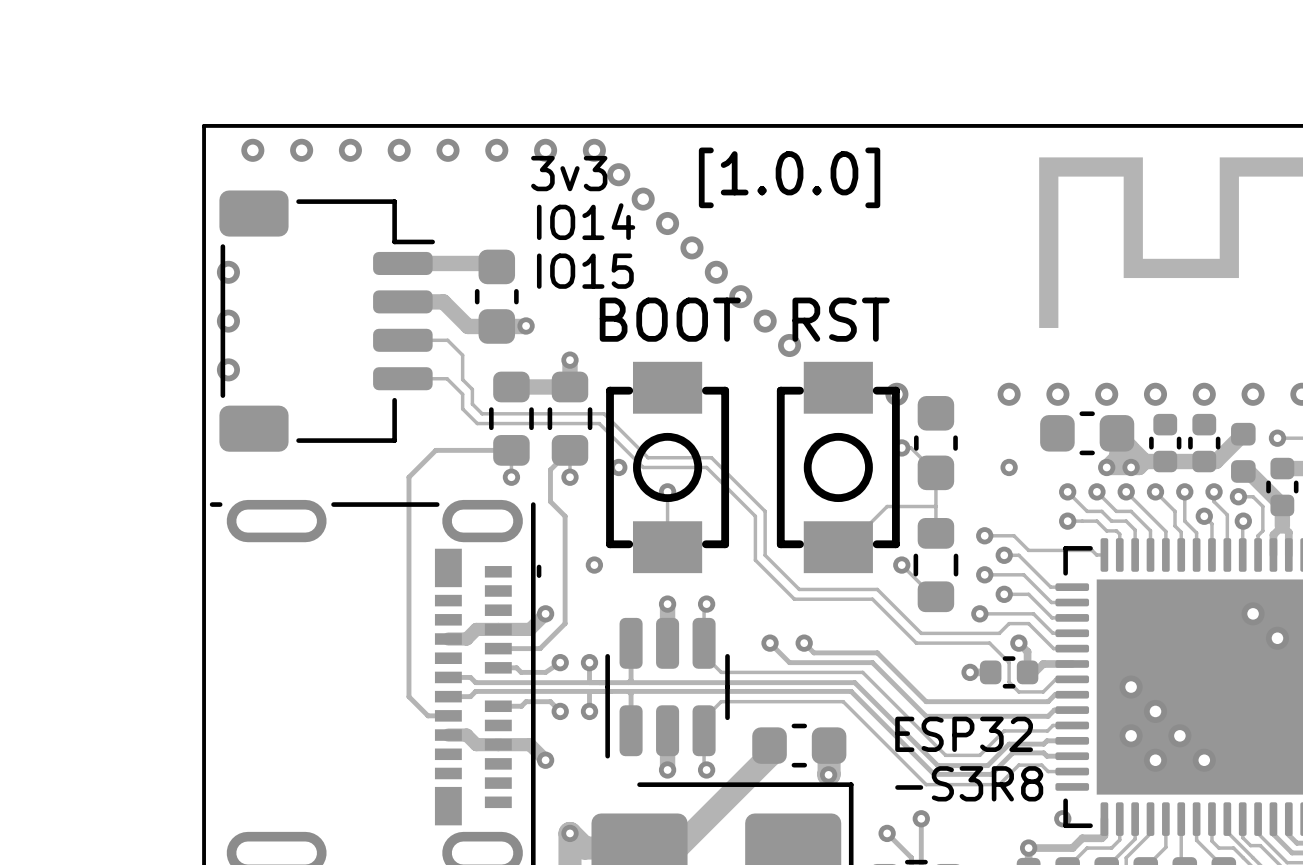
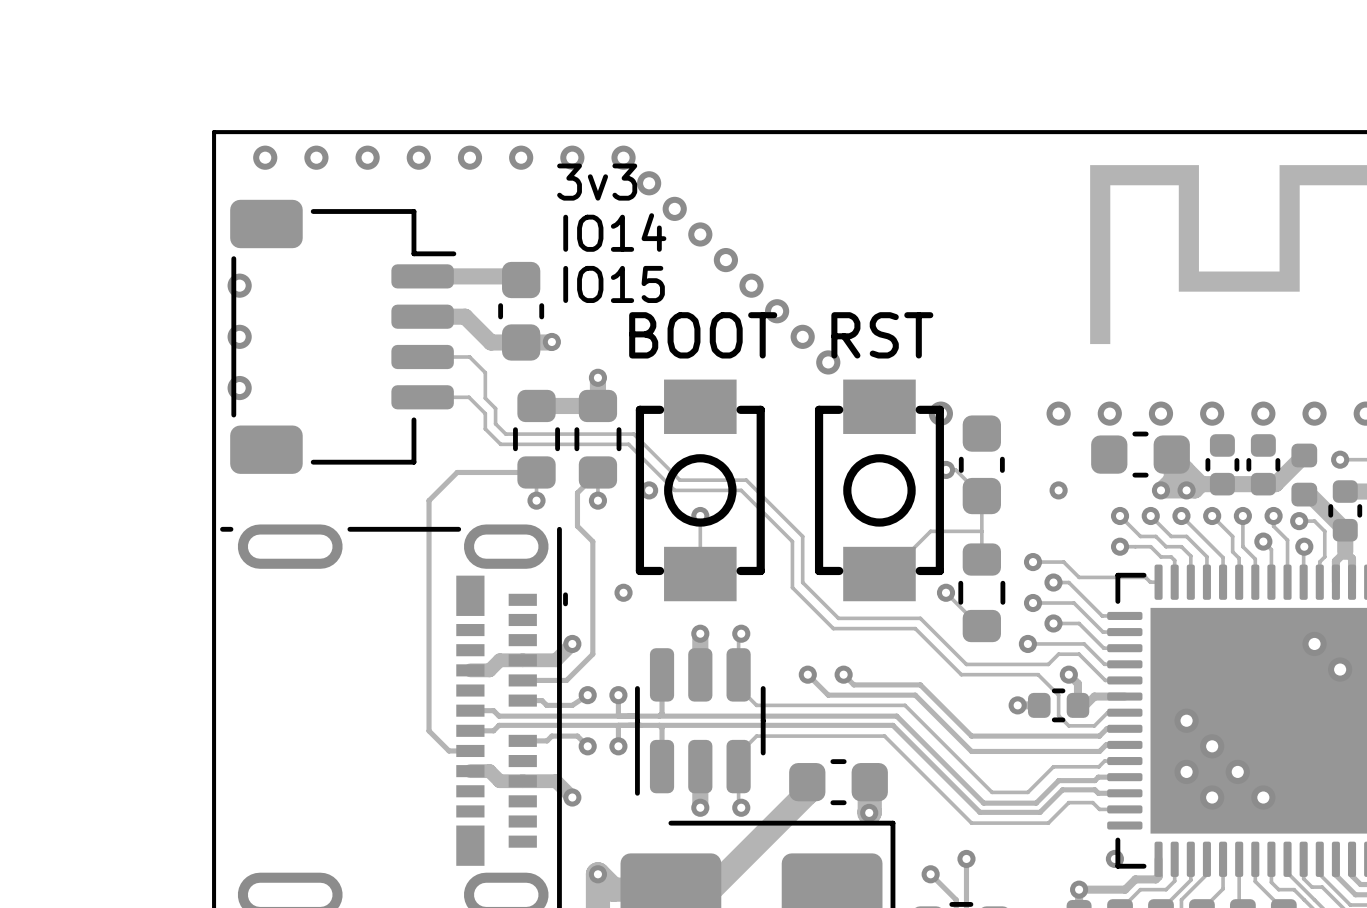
text: [1.0.0] (789, 177) -> none
text: ESP32 (964, 734) -> none
text: -S3R8 (969, 783) -> none

